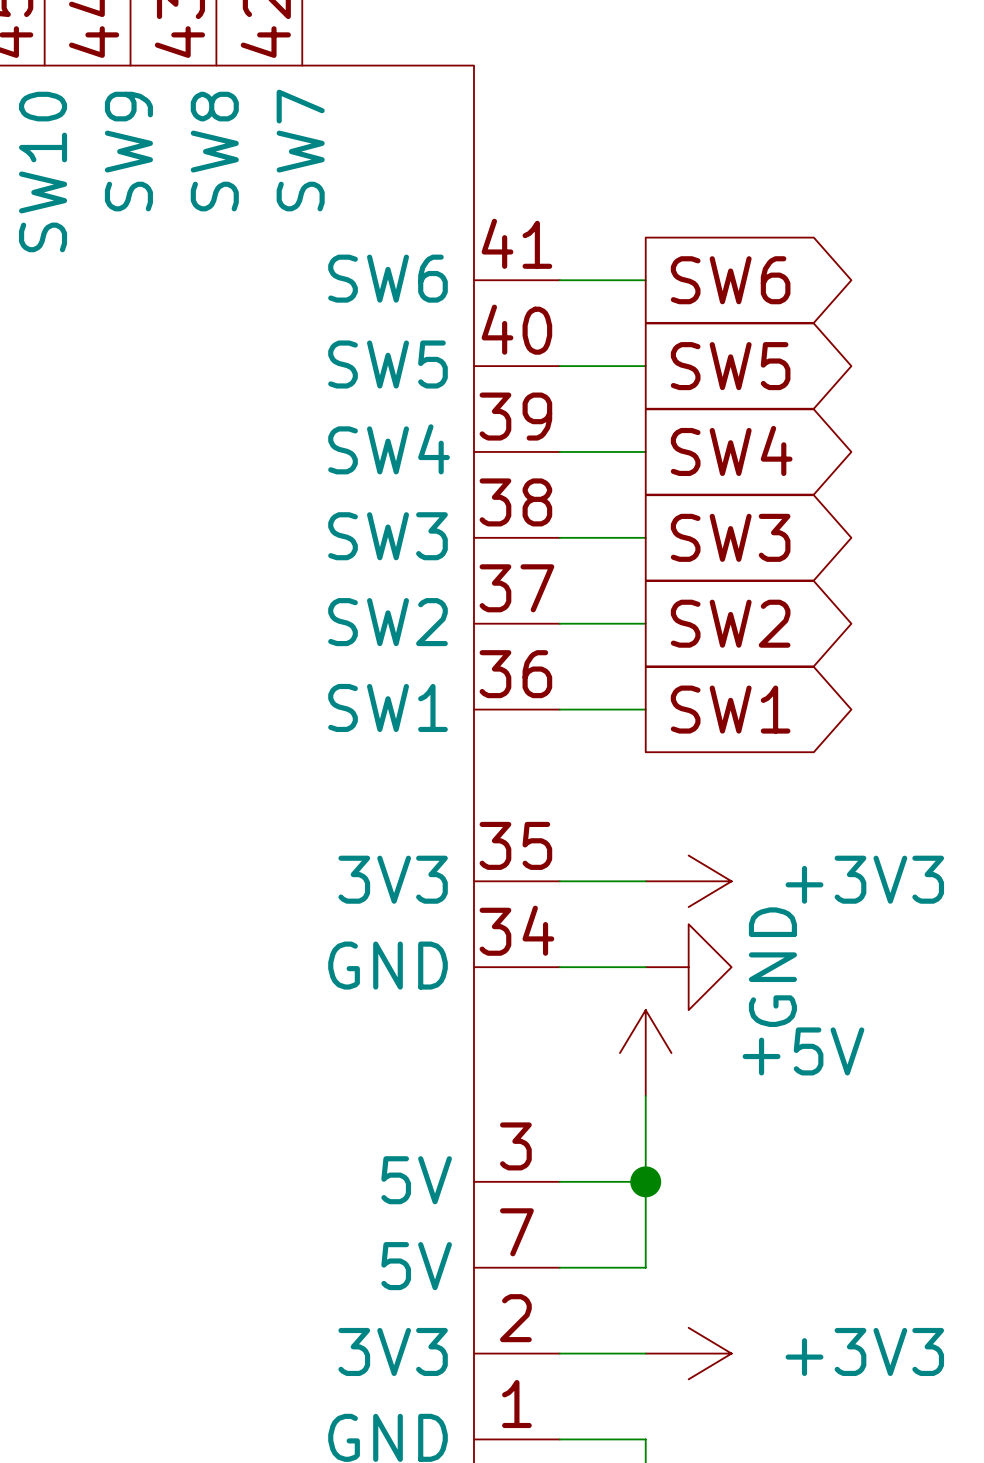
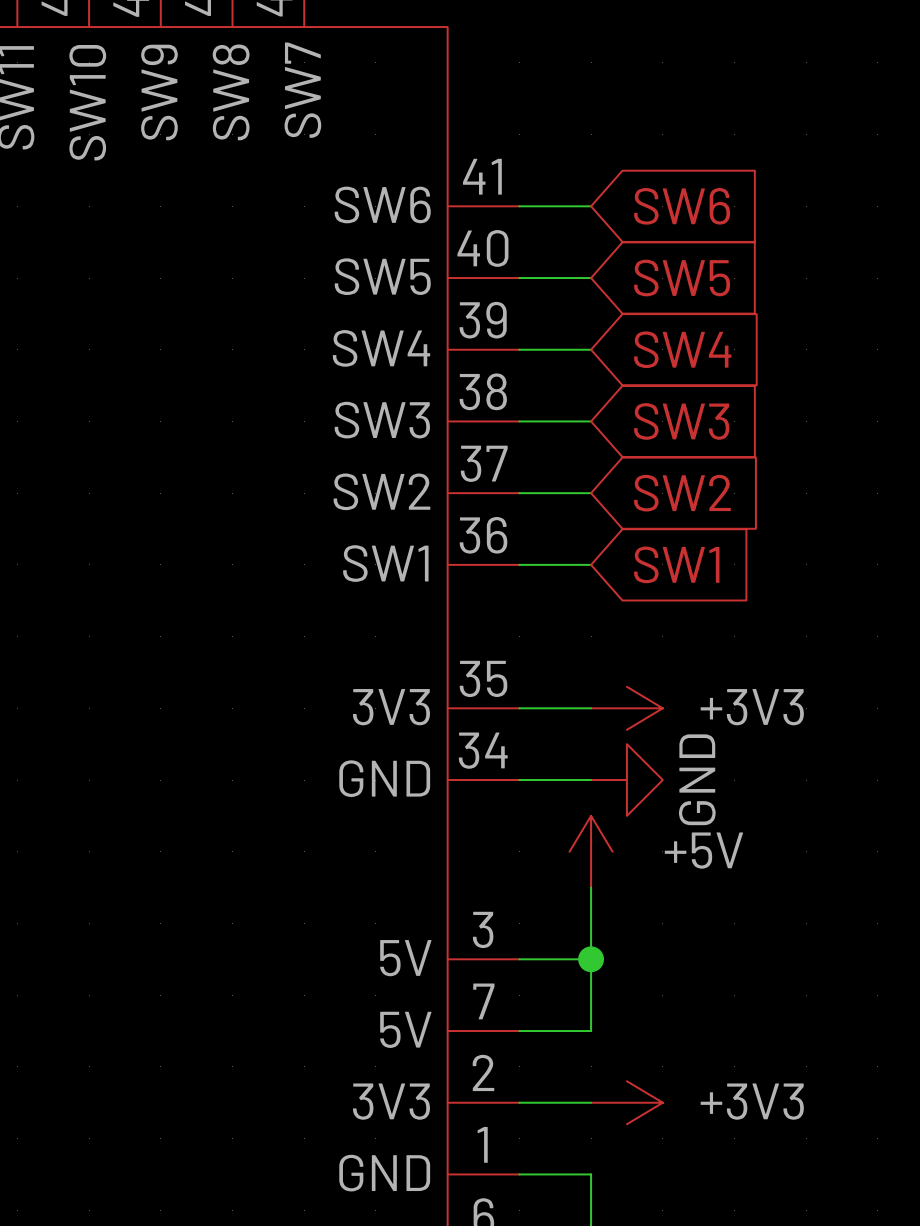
global label shape: output (730, 280) -> input (682, 206)
global label shape: output (730, 366) -> input (682, 278)
global label shape: output (731, 450) -> input (682, 349)
global label shape: output (730, 537) -> input (681, 421)
global label shape: output (730, 623) -> input (682, 493)
global label shape: output (730, 709) -> input (676, 564)

